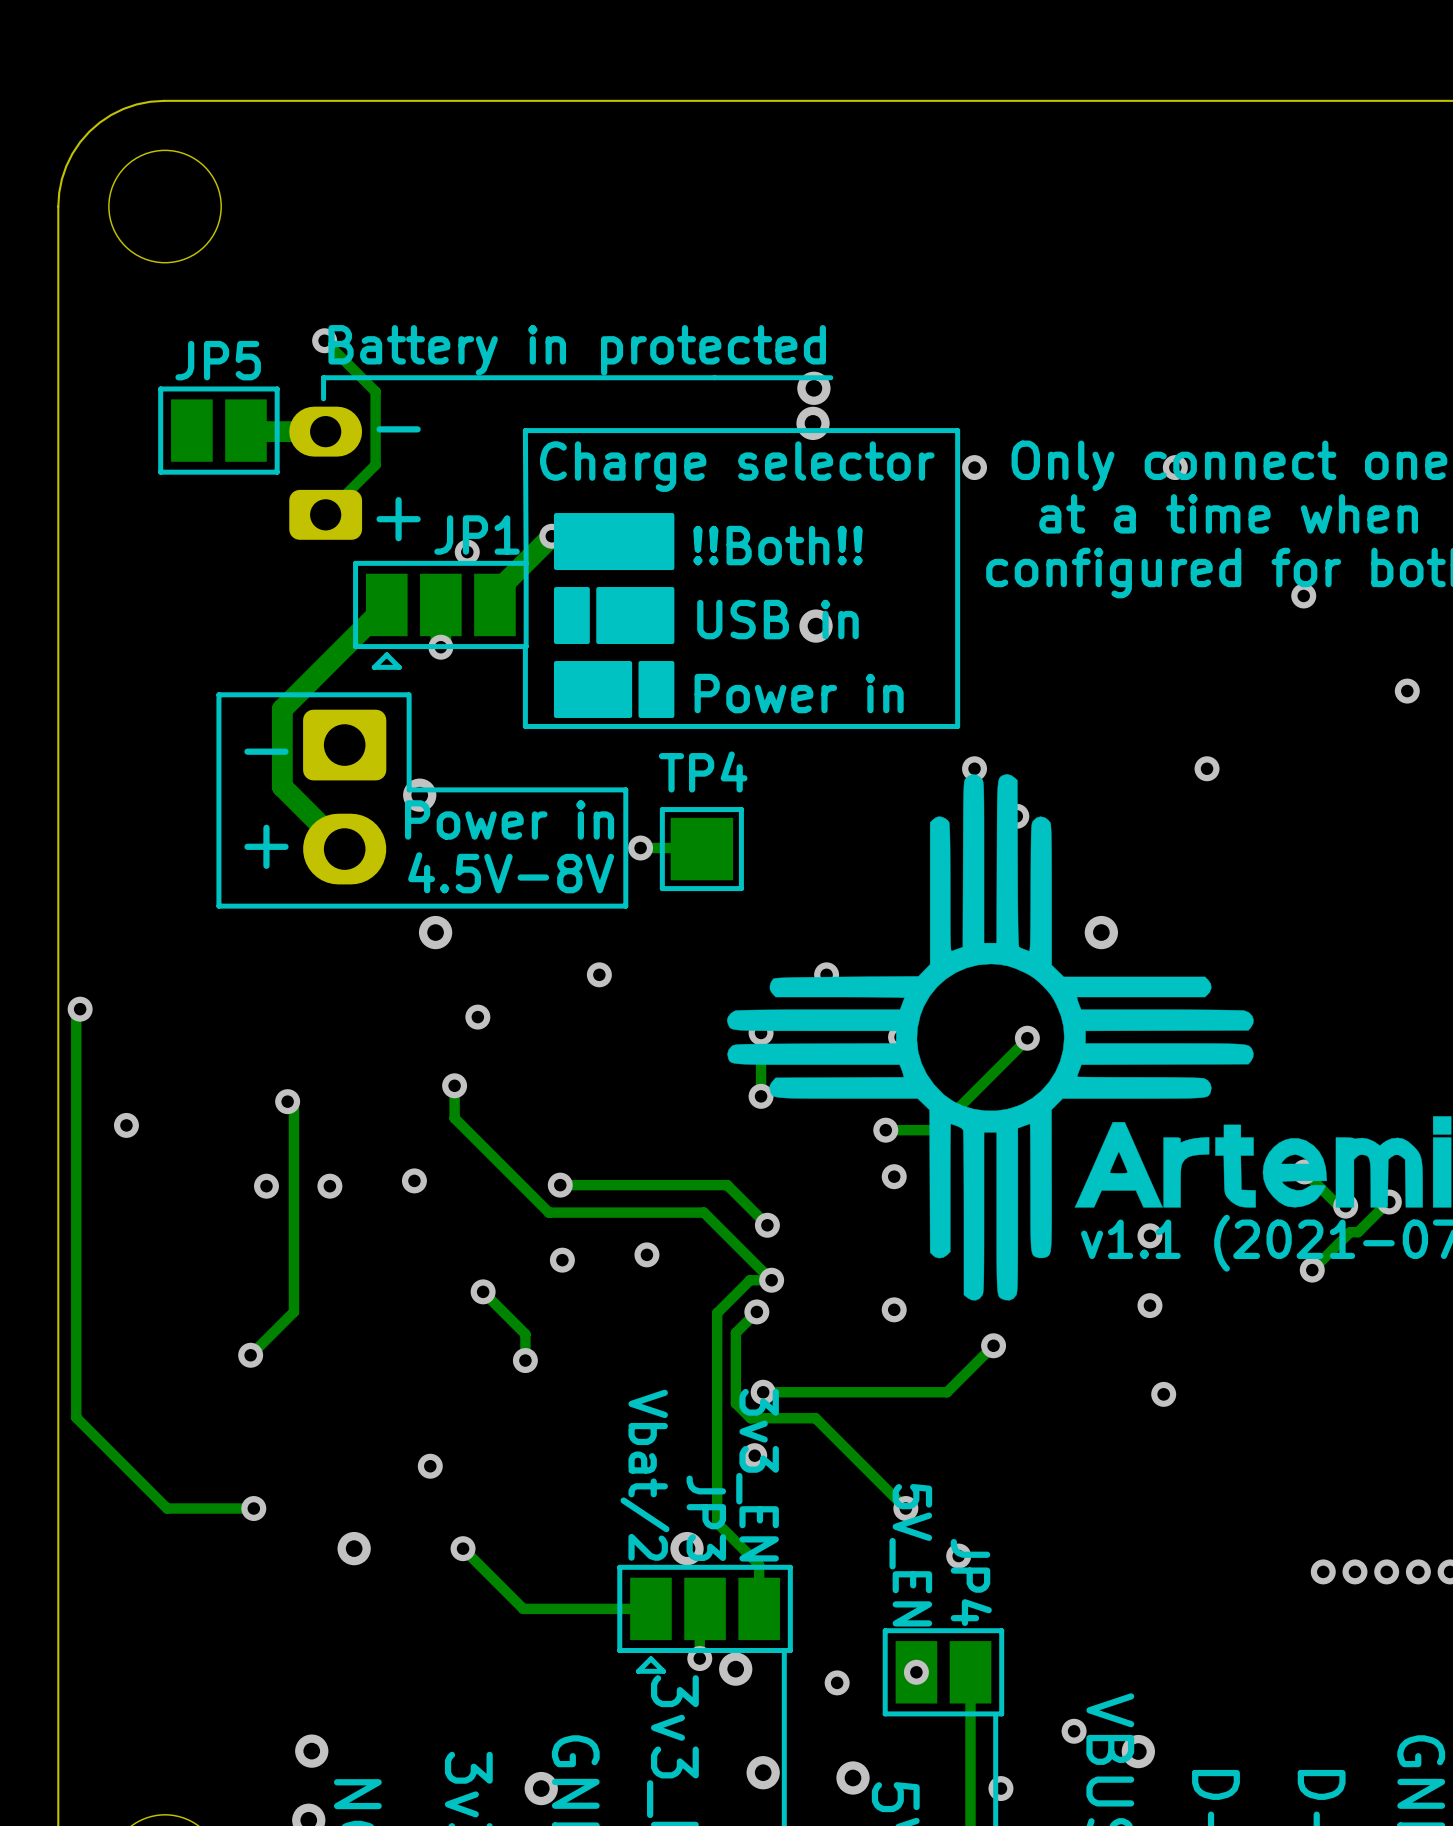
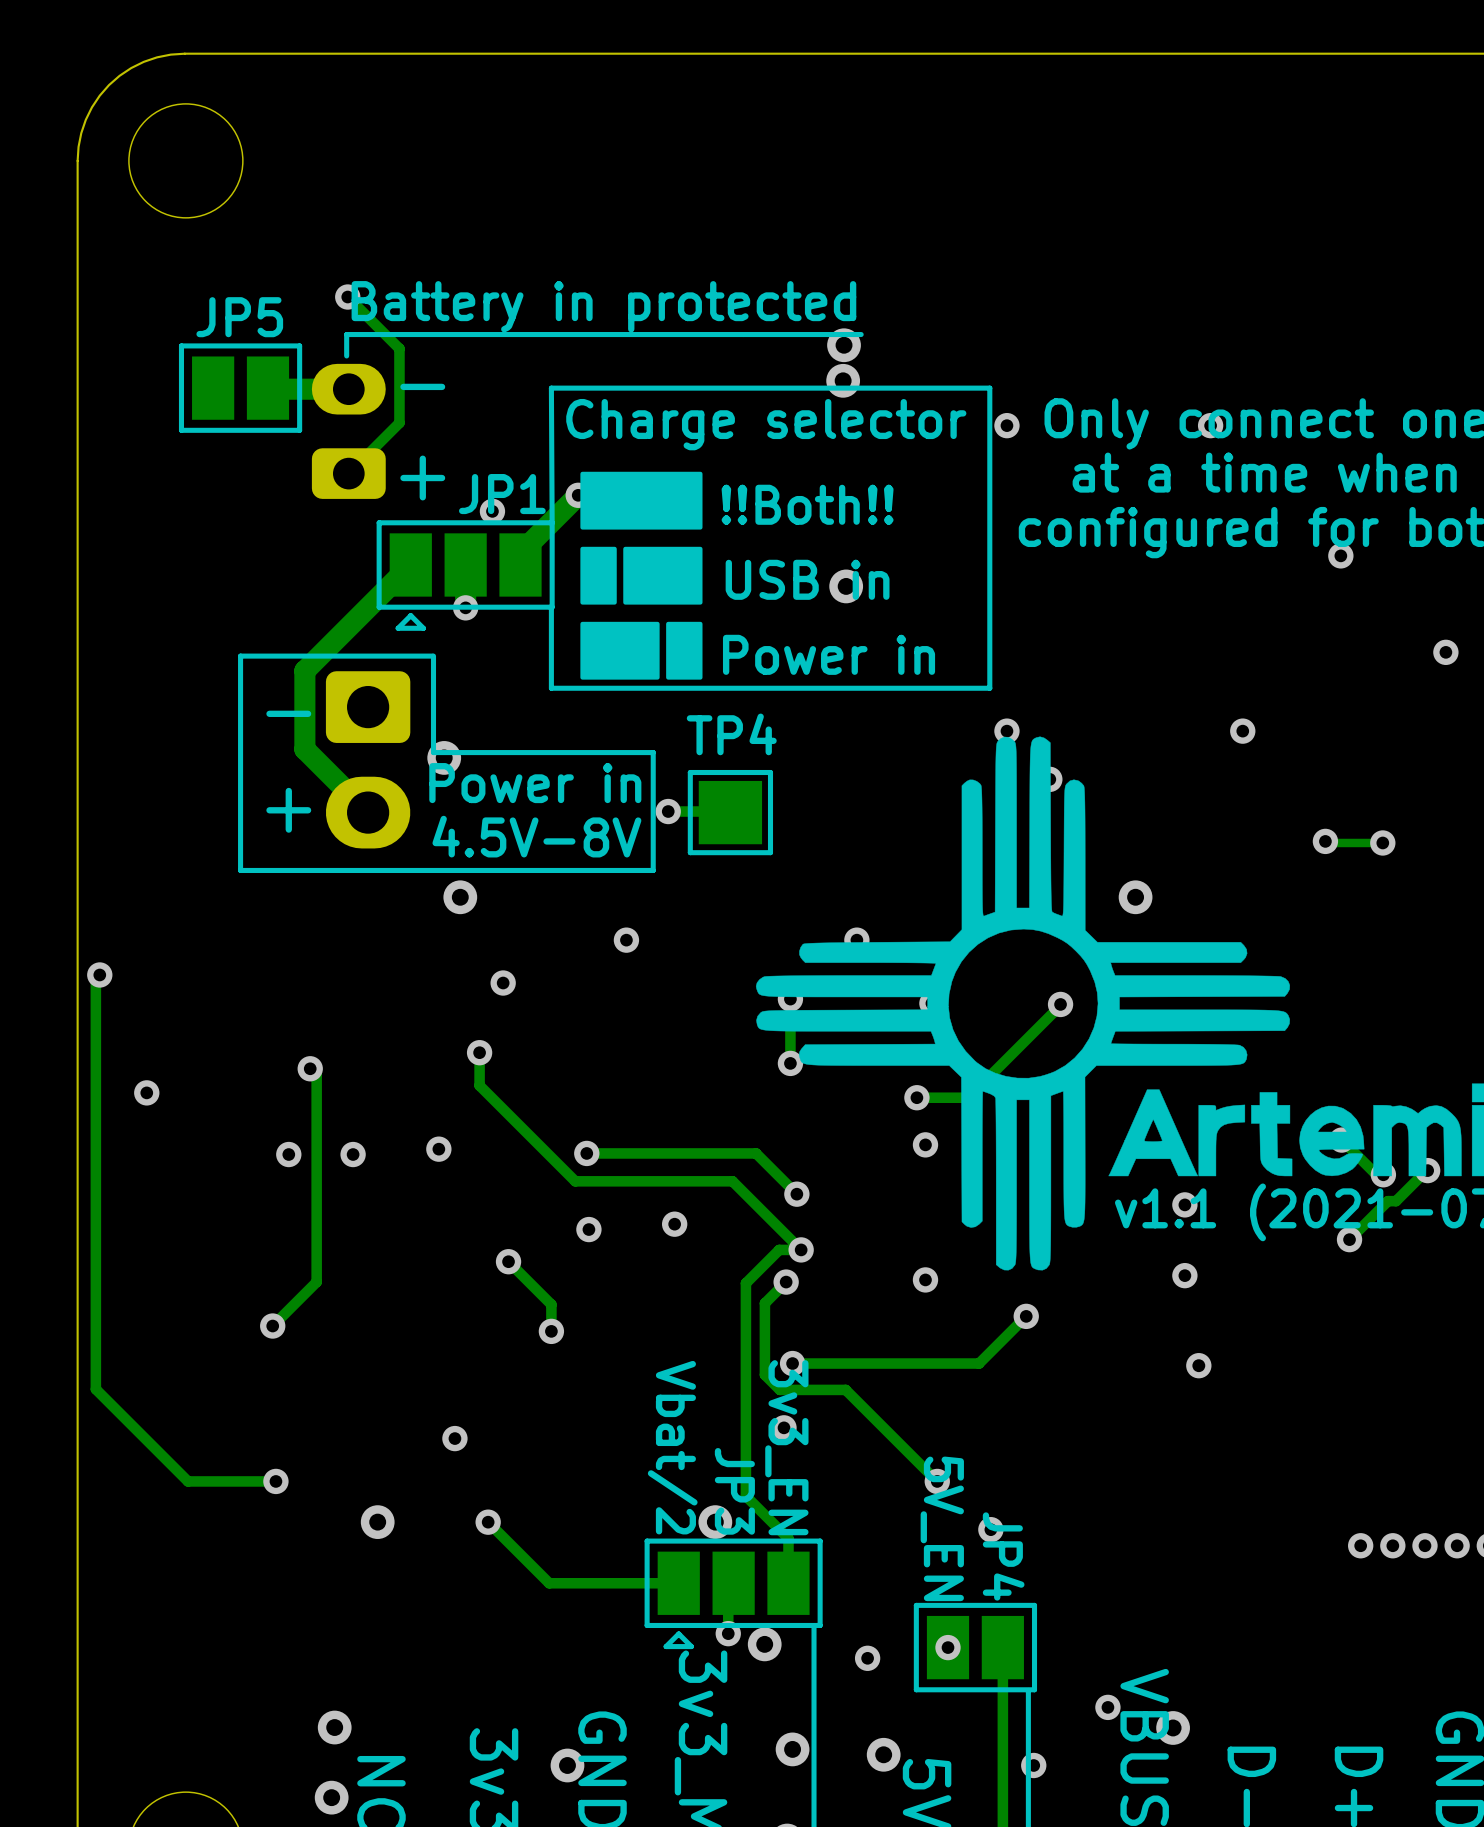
track: none -> (1325, 841) (1327, 842) (1382, 842)
via: none -> (1325, 841)
via: none -> (1382, 842)

